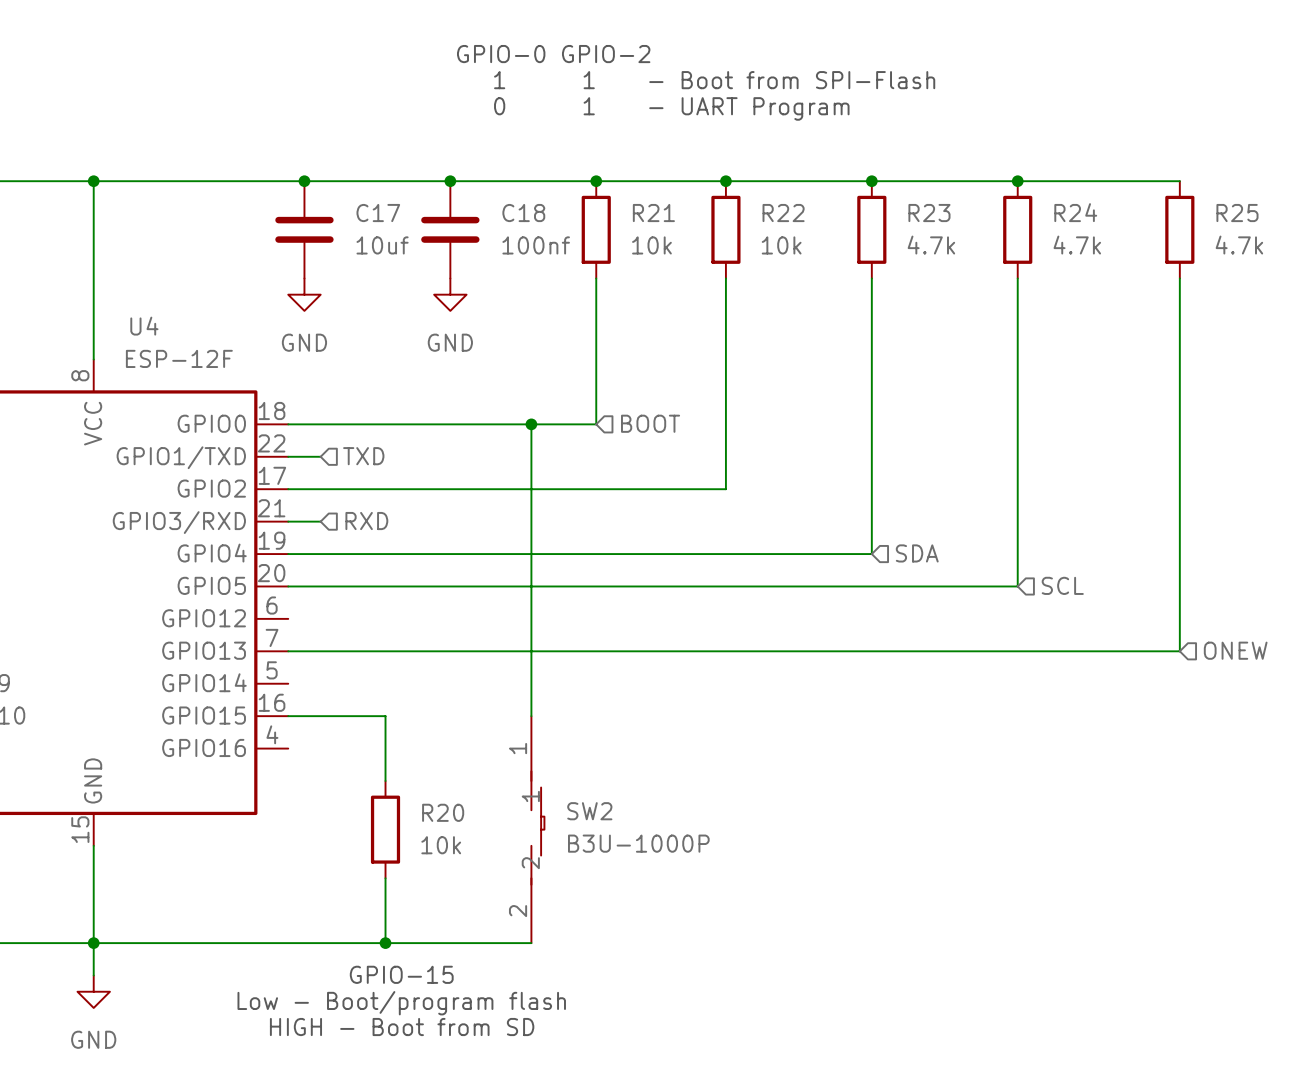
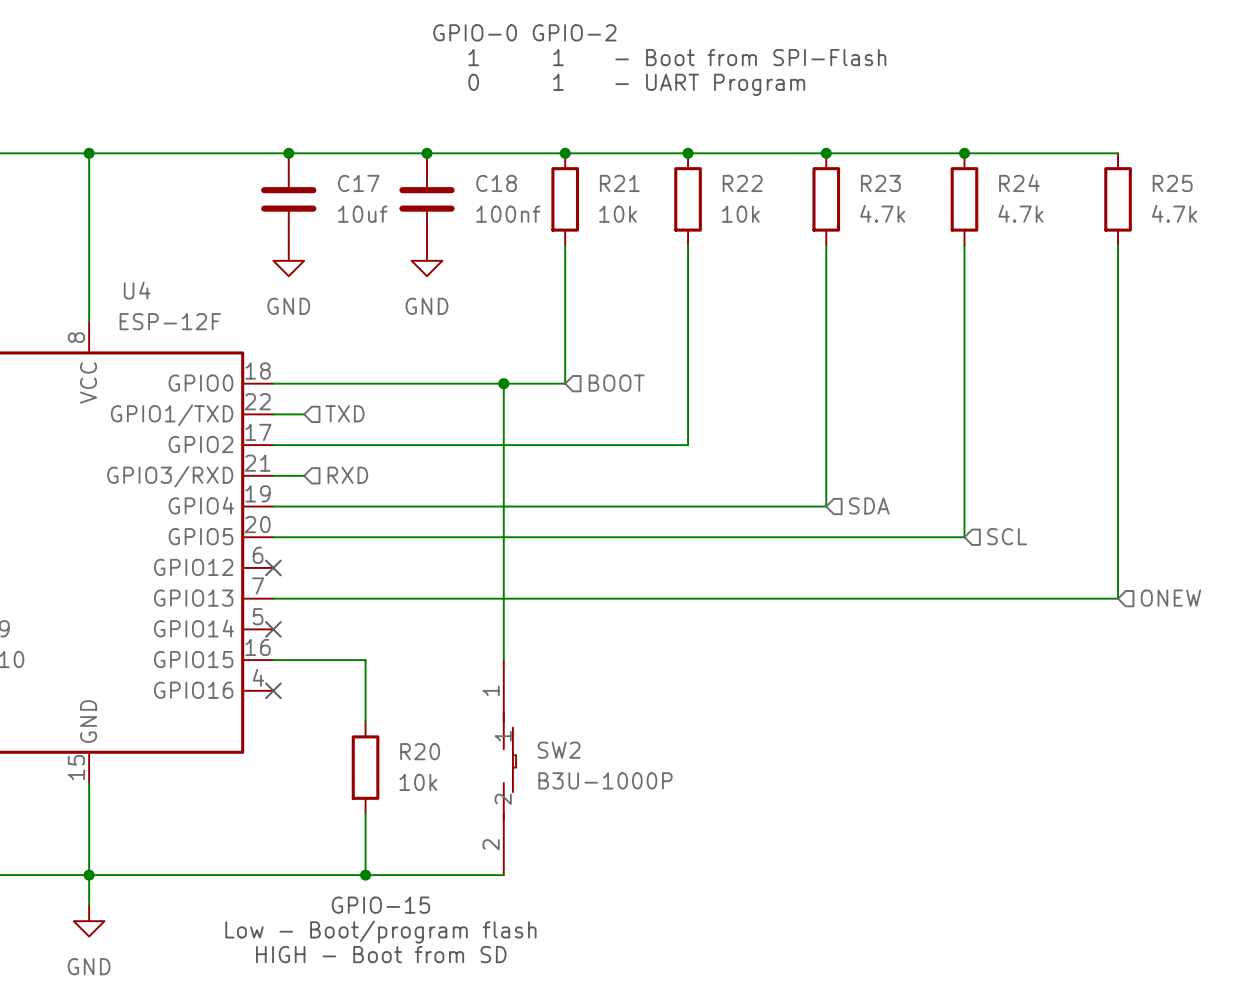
no-connect mark: none -> (273, 567)
no-connect mark: none -> (273, 629)
no-connect mark: none -> (273, 690)

